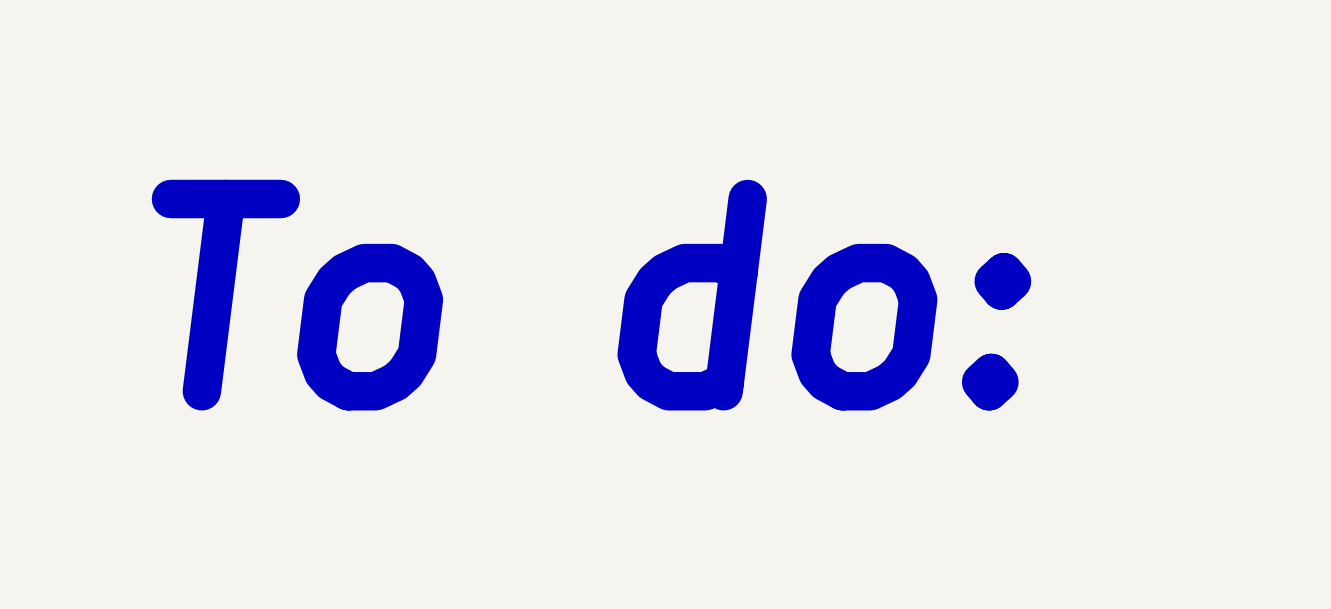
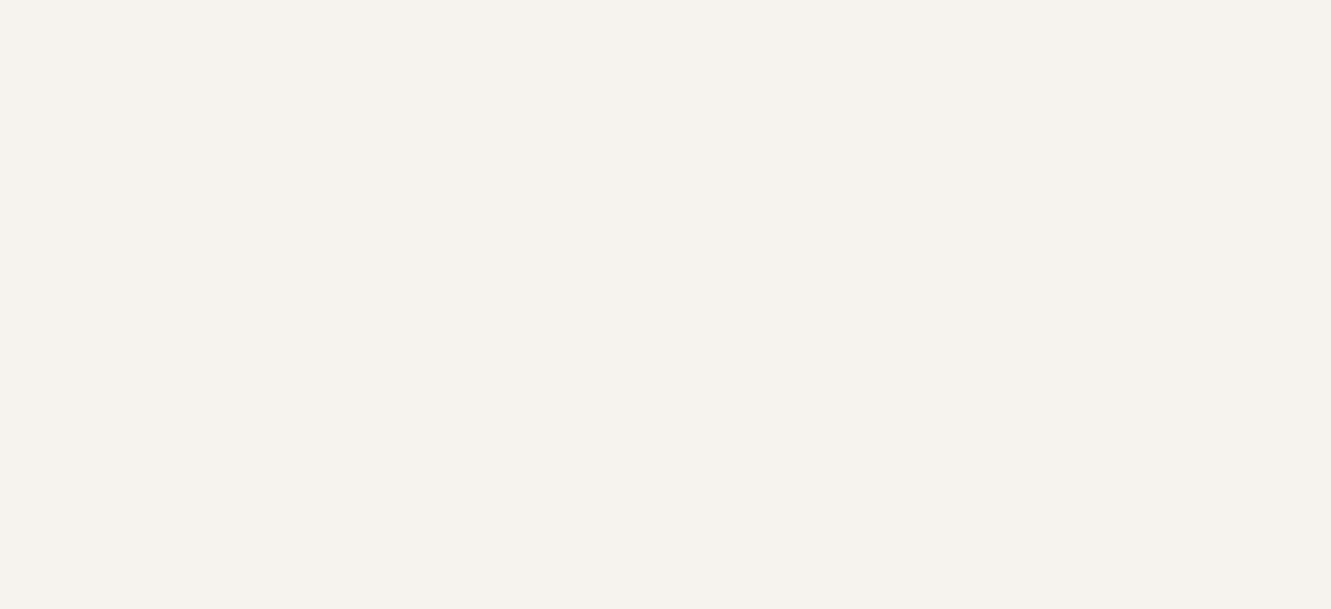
text: To do: (591, 295) -> none

